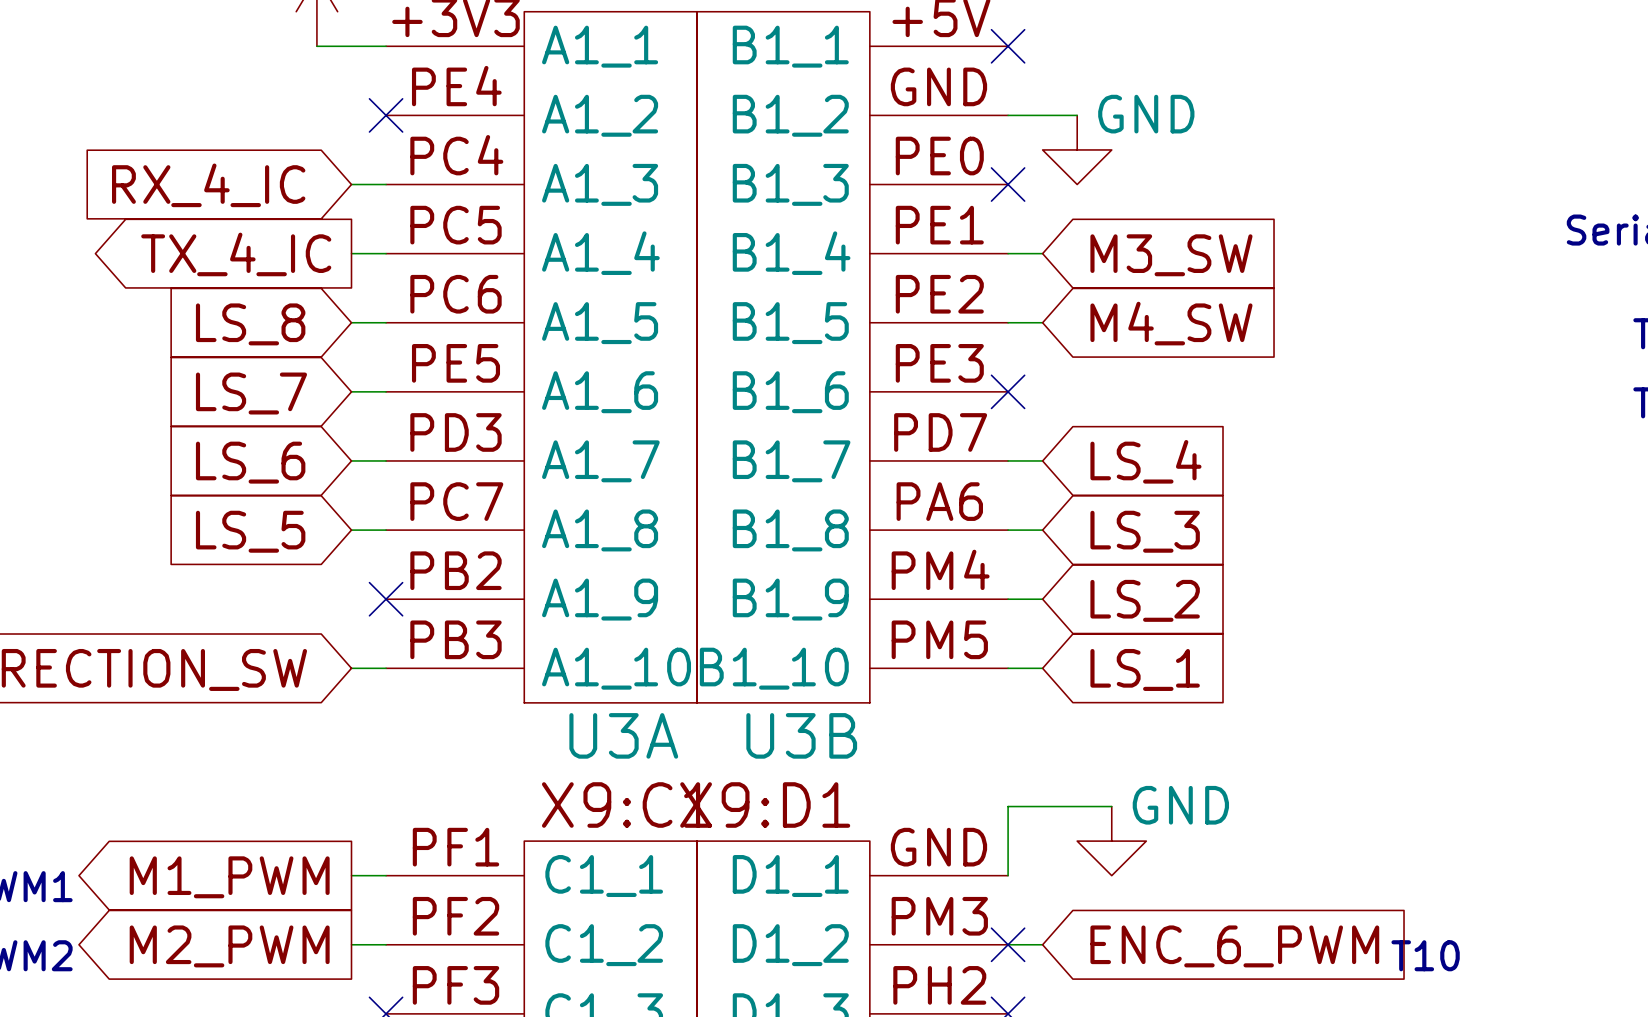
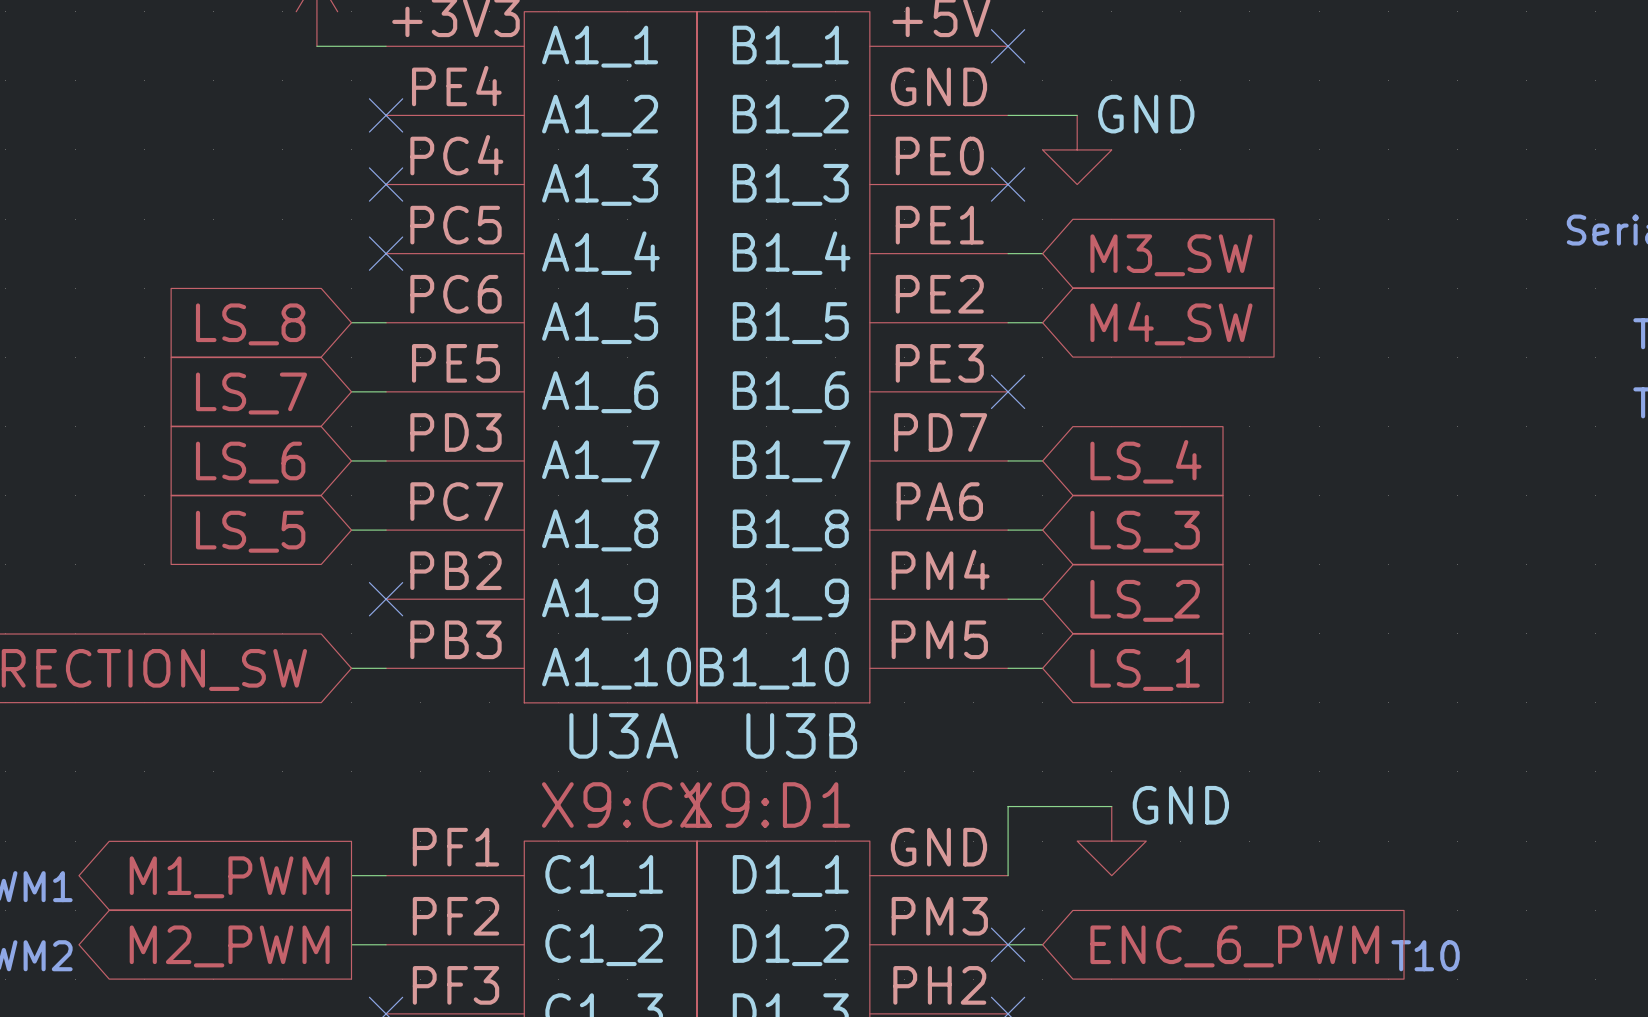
wire: (351, 184) (386, 184) -> none
no-connect mark: none -> (386, 184)
global label: RX_4_IC (208, 185) -> none
wire: (351, 253) (386, 253) -> none
no-connect mark: none -> (386, 253)
global label: TX_4_IC (236, 254) -> none

